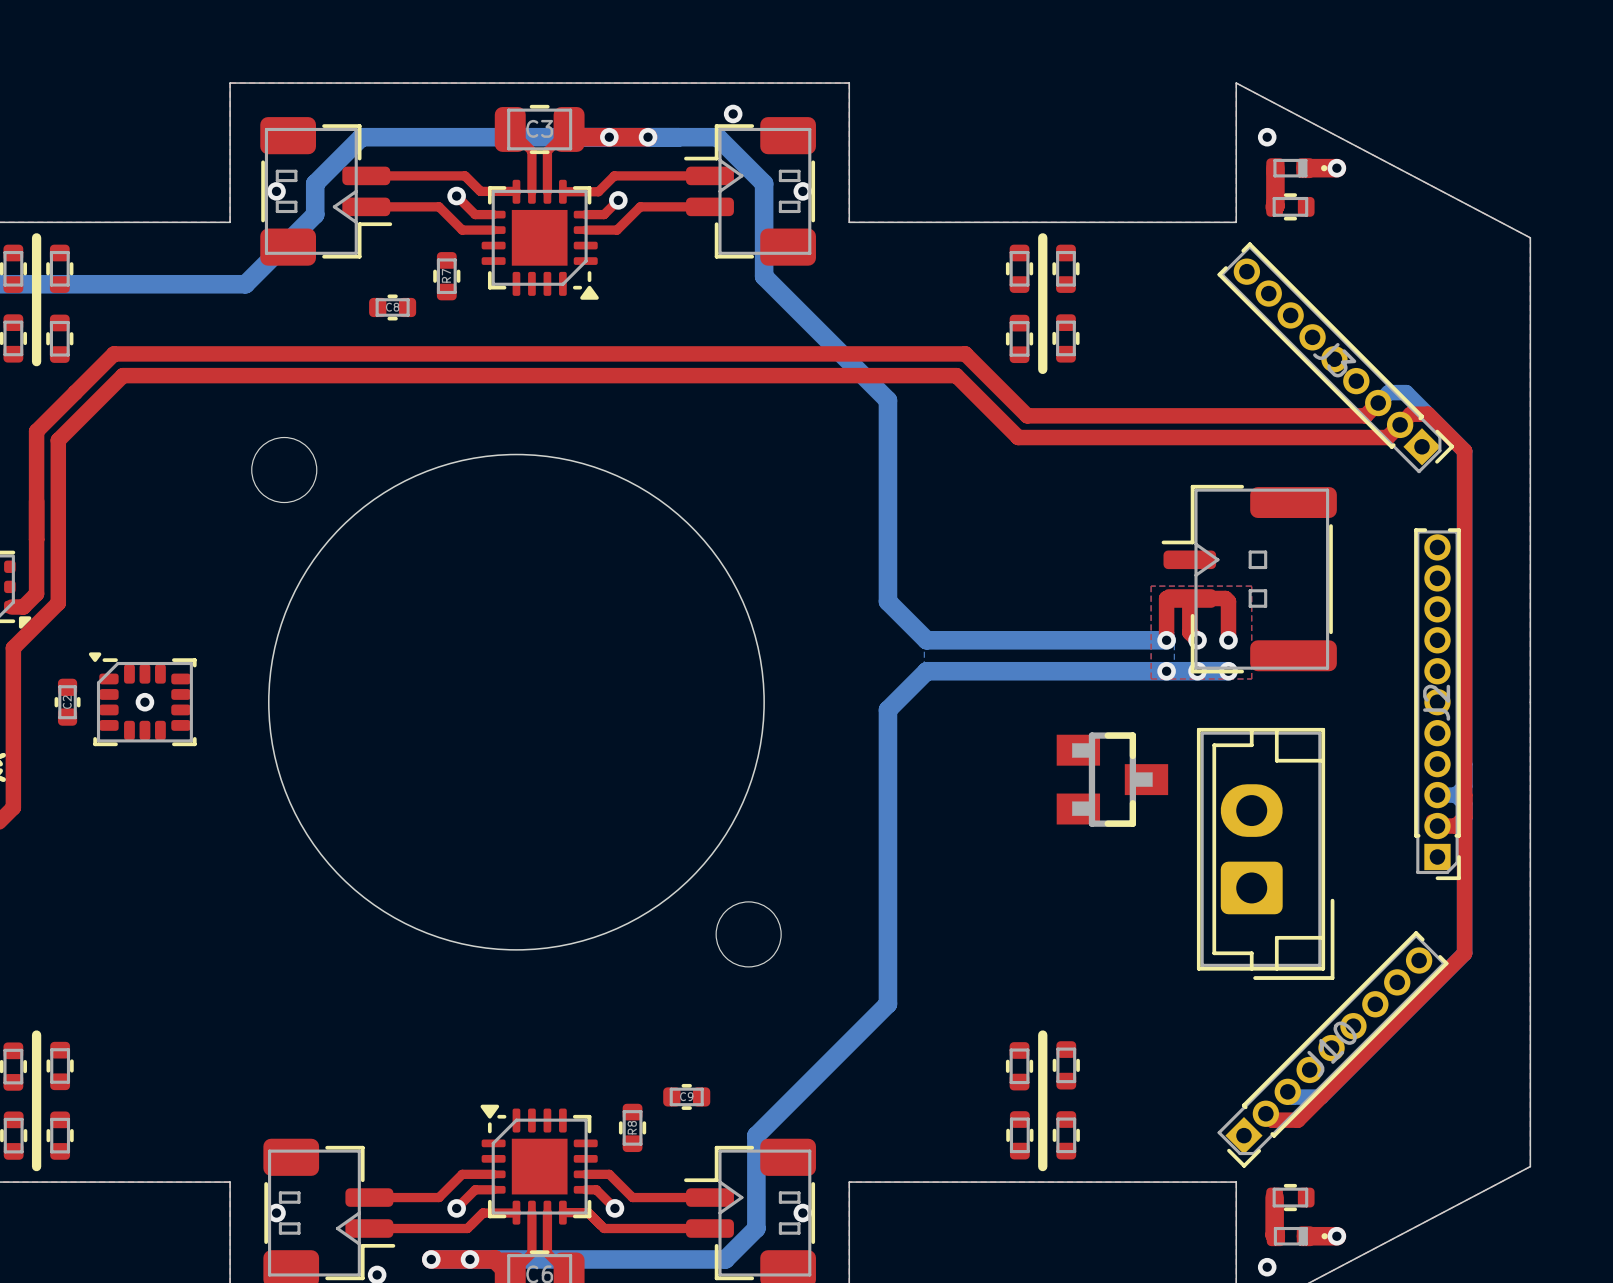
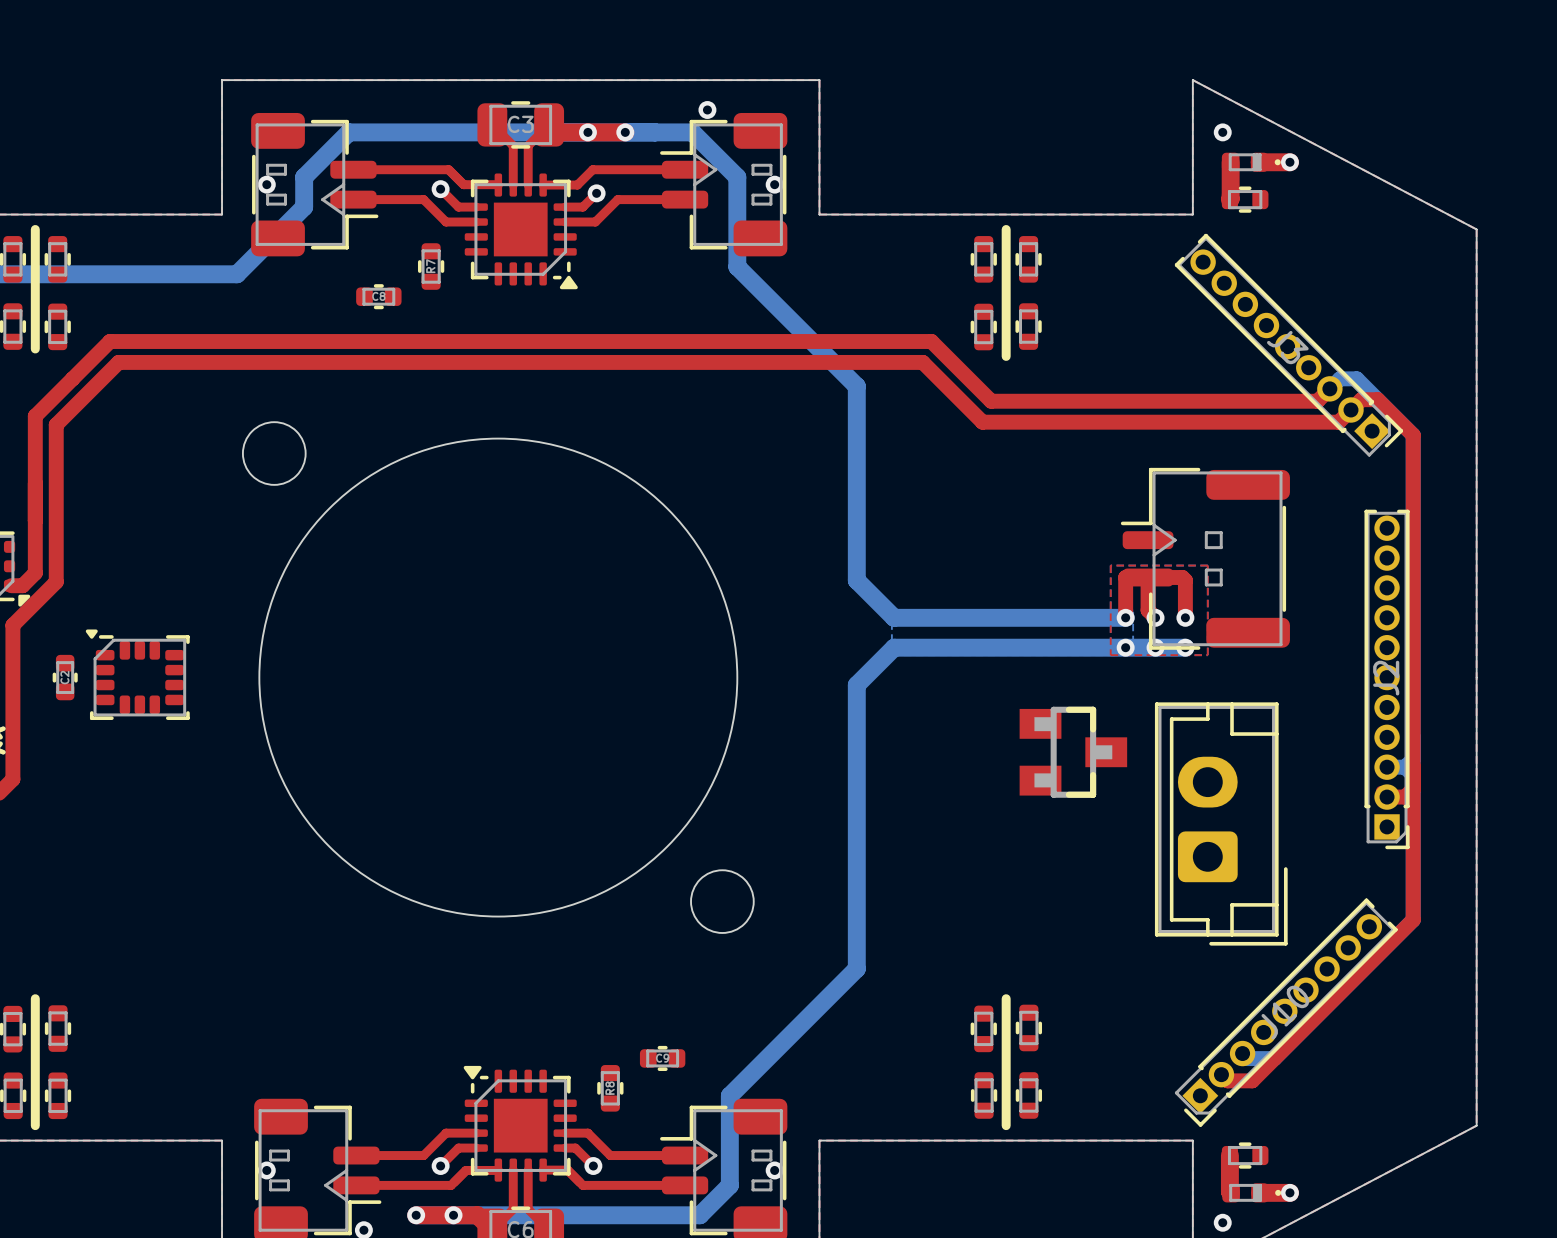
via: (144, 702) -> none

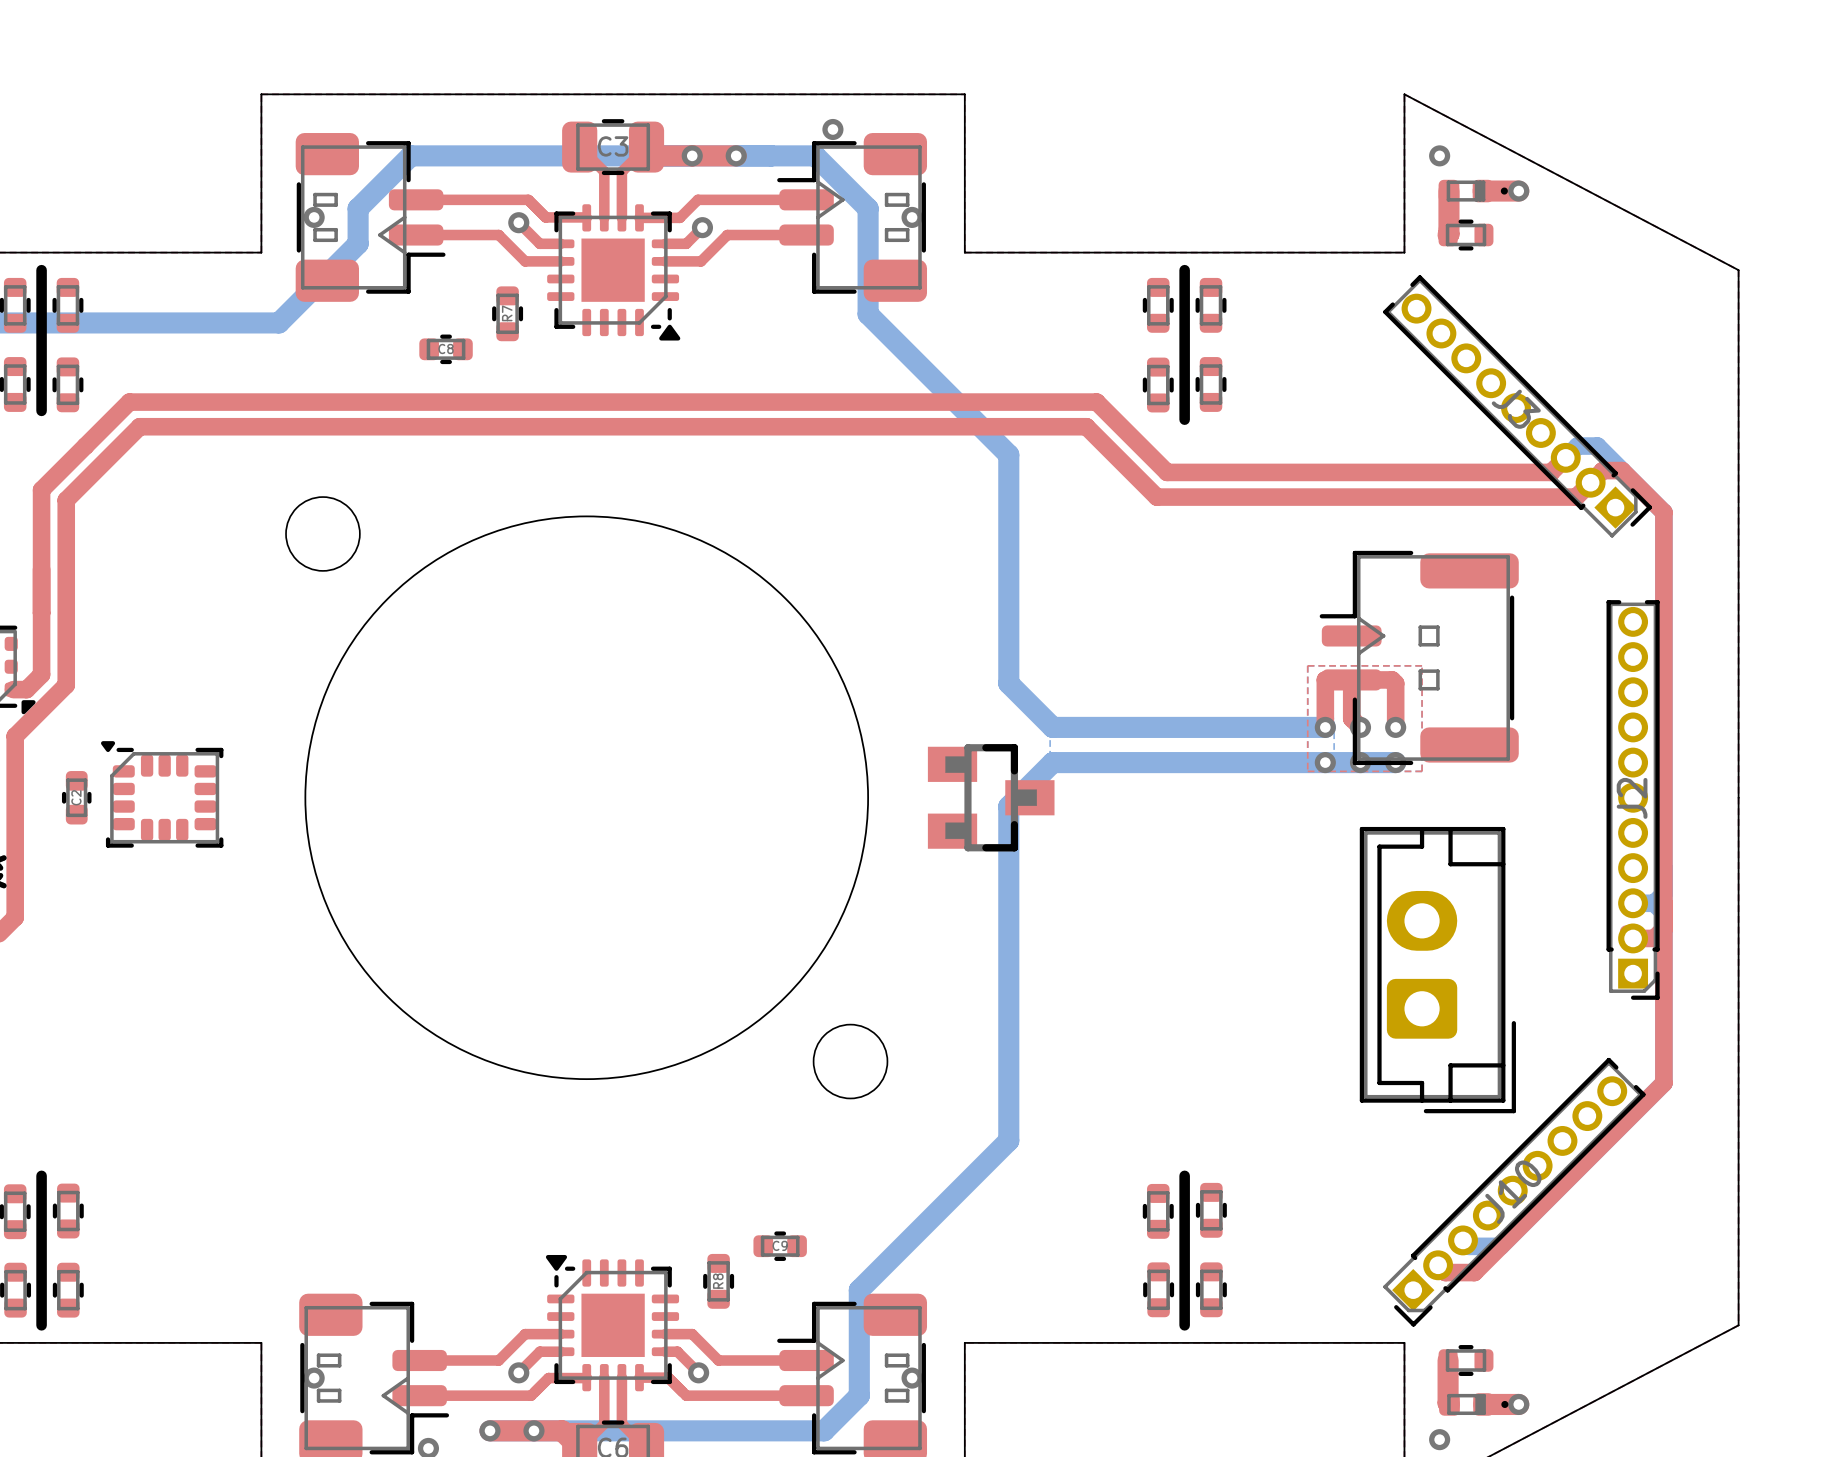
part position: (1073, 752) -> (991, 797)

